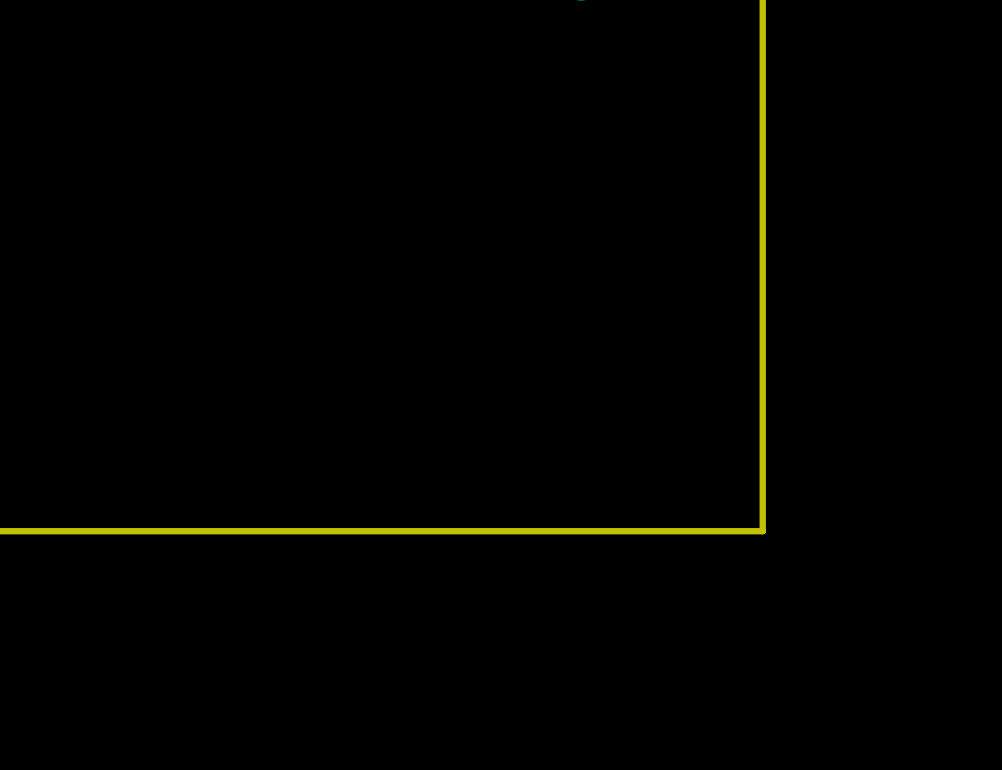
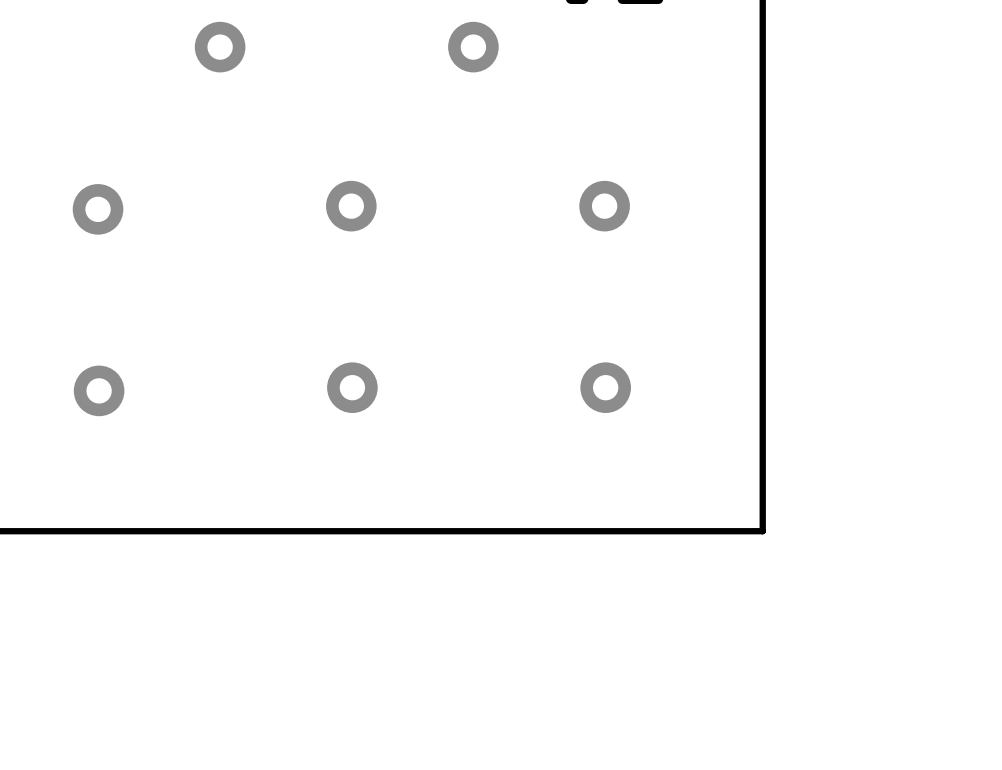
via: none -> (220, 47)
via: none -> (473, 47)
via: none -> (351, 206)
via: none -> (604, 206)
via: none -> (98, 209)
via: none -> (352, 387)
via: none -> (605, 387)
via: none -> (99, 390)

